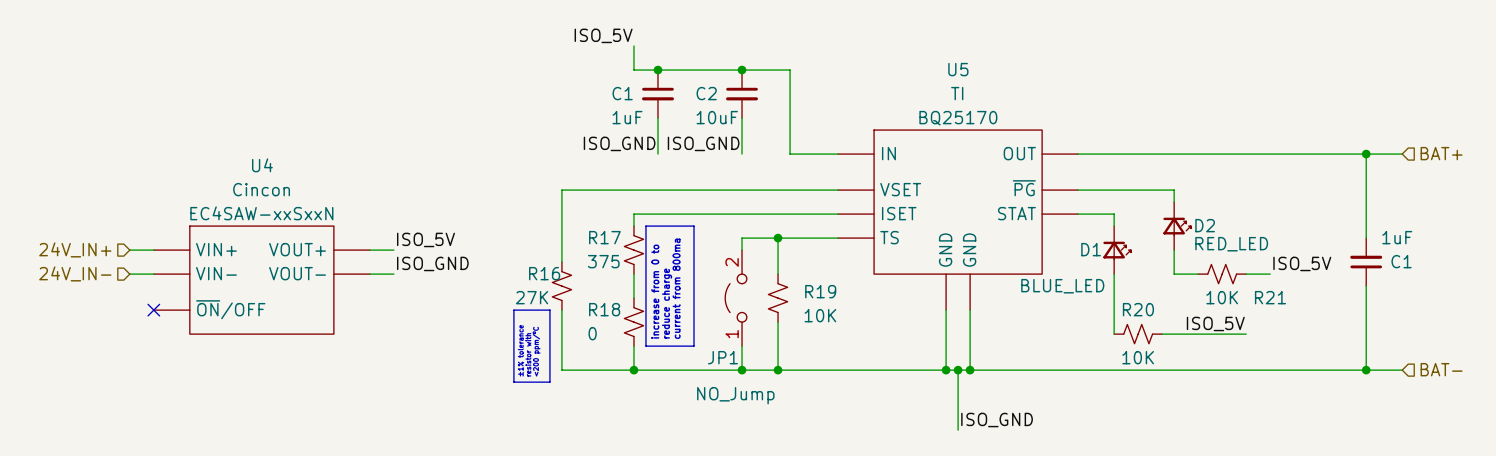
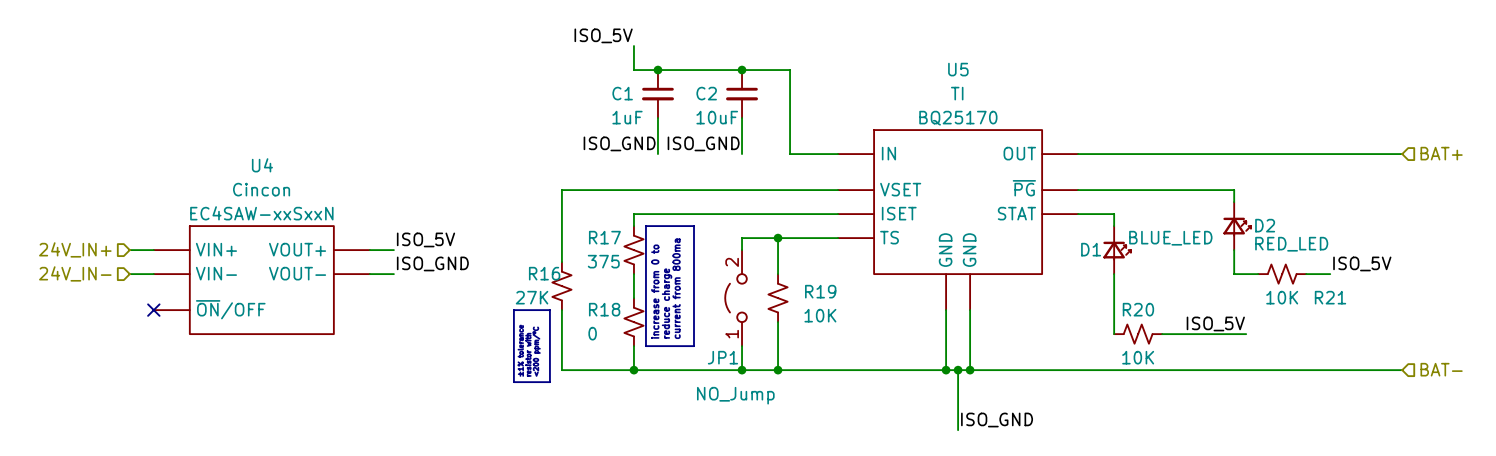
wire: (1366, 154) (1366, 238) -> none
junction: (1366, 154) -> none
wire: (1174, 190) (1174, 202) -> (1174, 190) (1234, 190) (1234, 202)
D2 position: (1177, 226) -> (1237, 226)
wire: (1174, 250) (1174, 274) (1198, 274) -> none
wire: none -> (1234, 250) (1234, 274) (1246, 274)
C1: 1uF (1366, 262) -> none
label position: ISO_5V (1302, 263) -> ISO_5V (1362, 263)
R21 position: (1222, 274) -> (1282, 274)
wire: none -> (1306, 274) (1330, 274)
D1 value position: BLUE_LED (1062, 286) -> BLUE_LED (1170, 238)
wire: (1366, 286) (1366, 370) -> none
junction: (1366, 370) -> none

